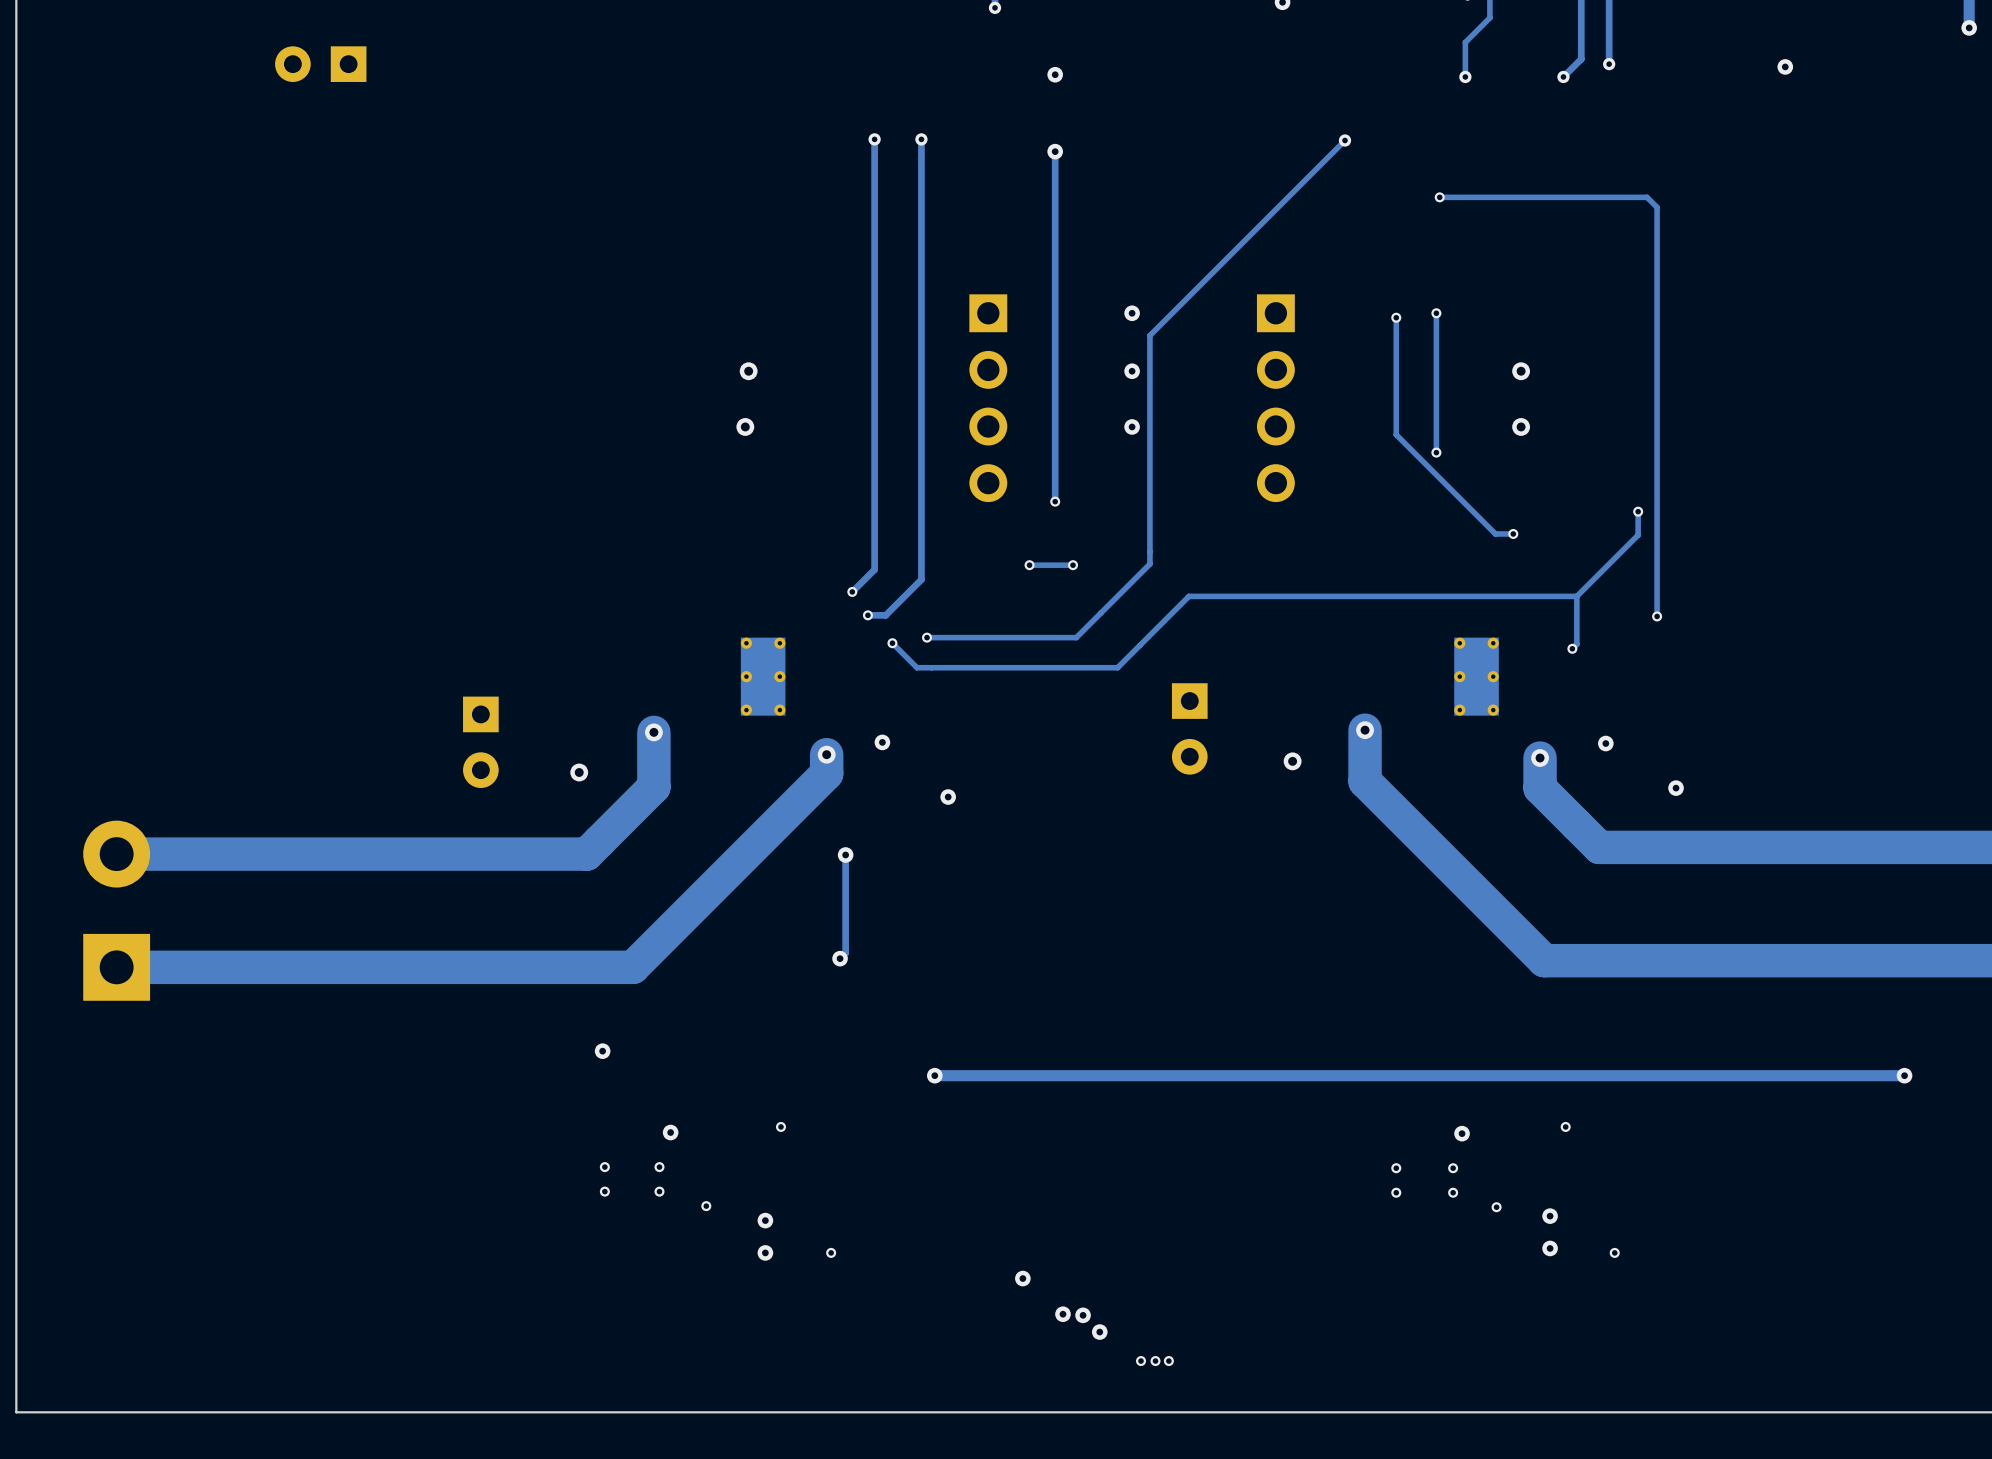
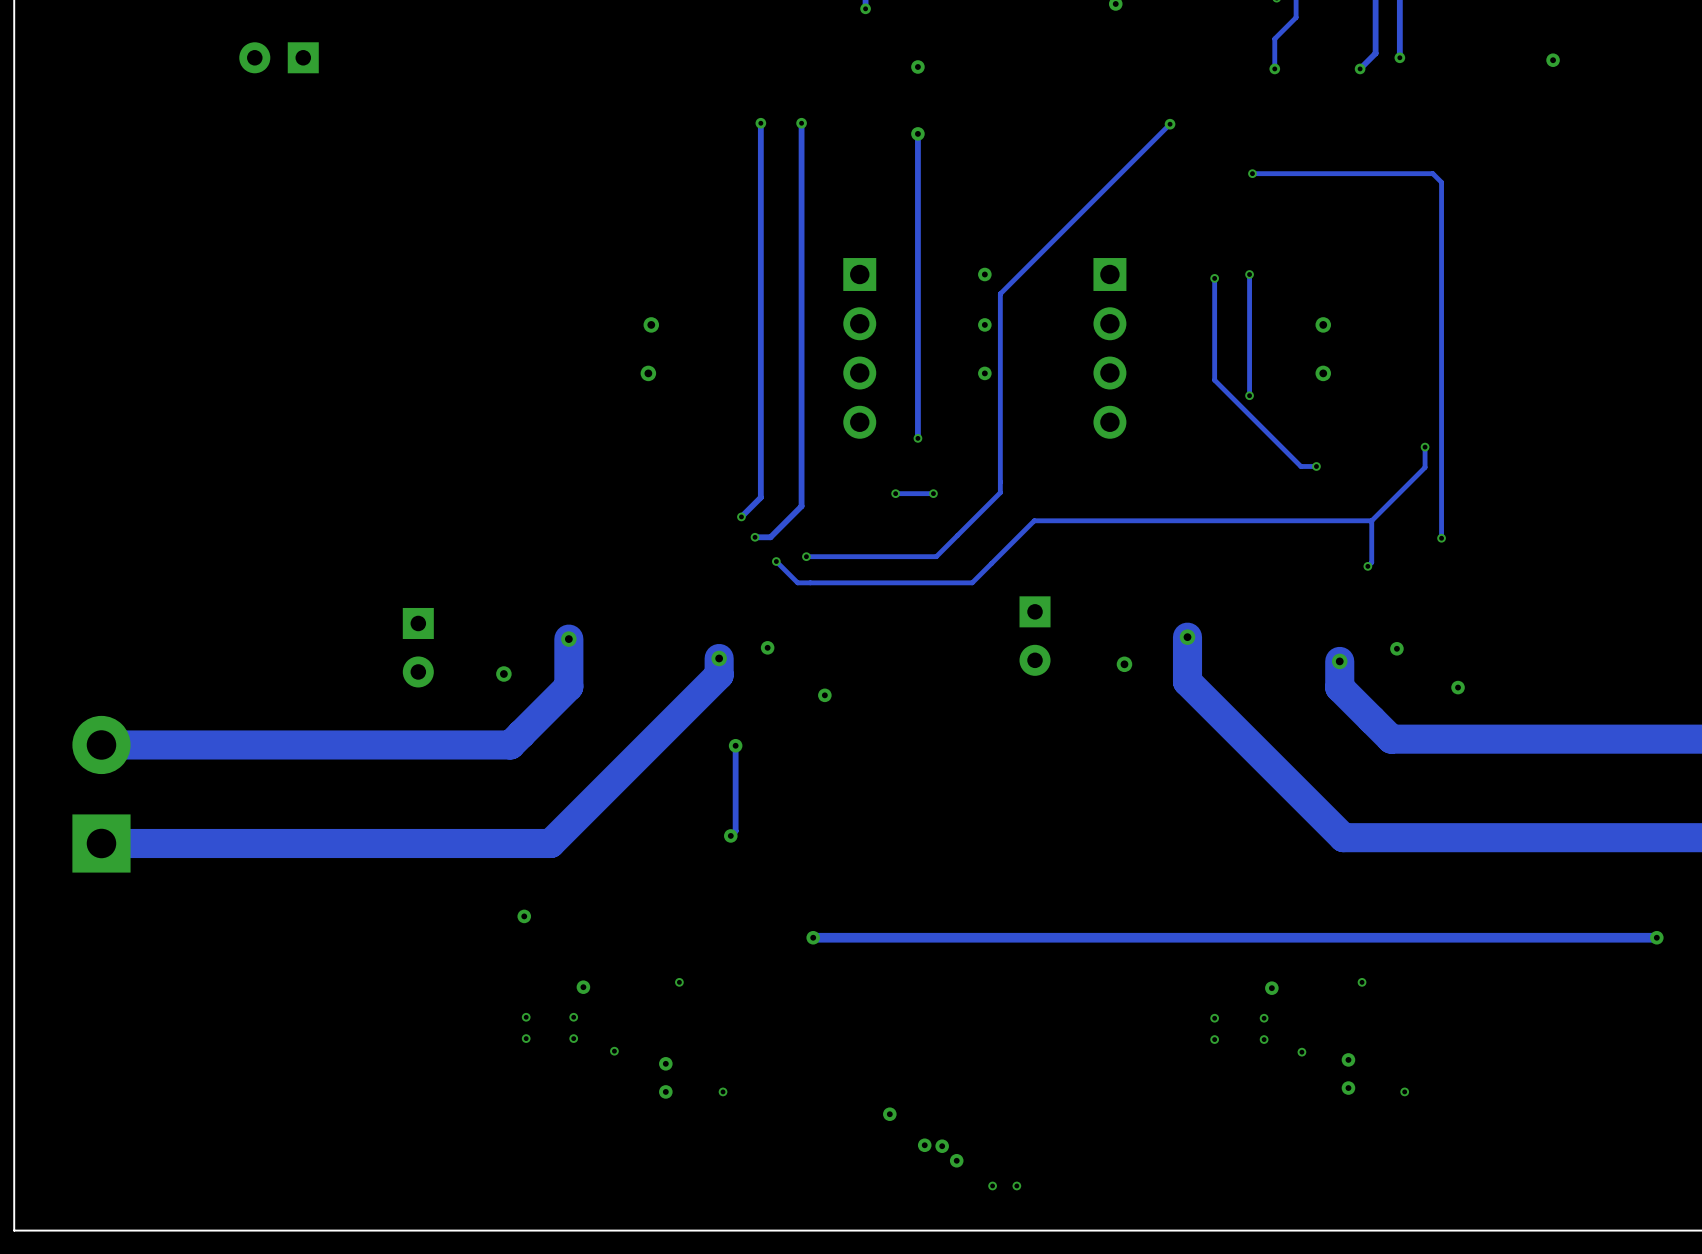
part: (763, 676) -> none
part: (1476, 676) -> none
via: (1155, 1361) -> none

